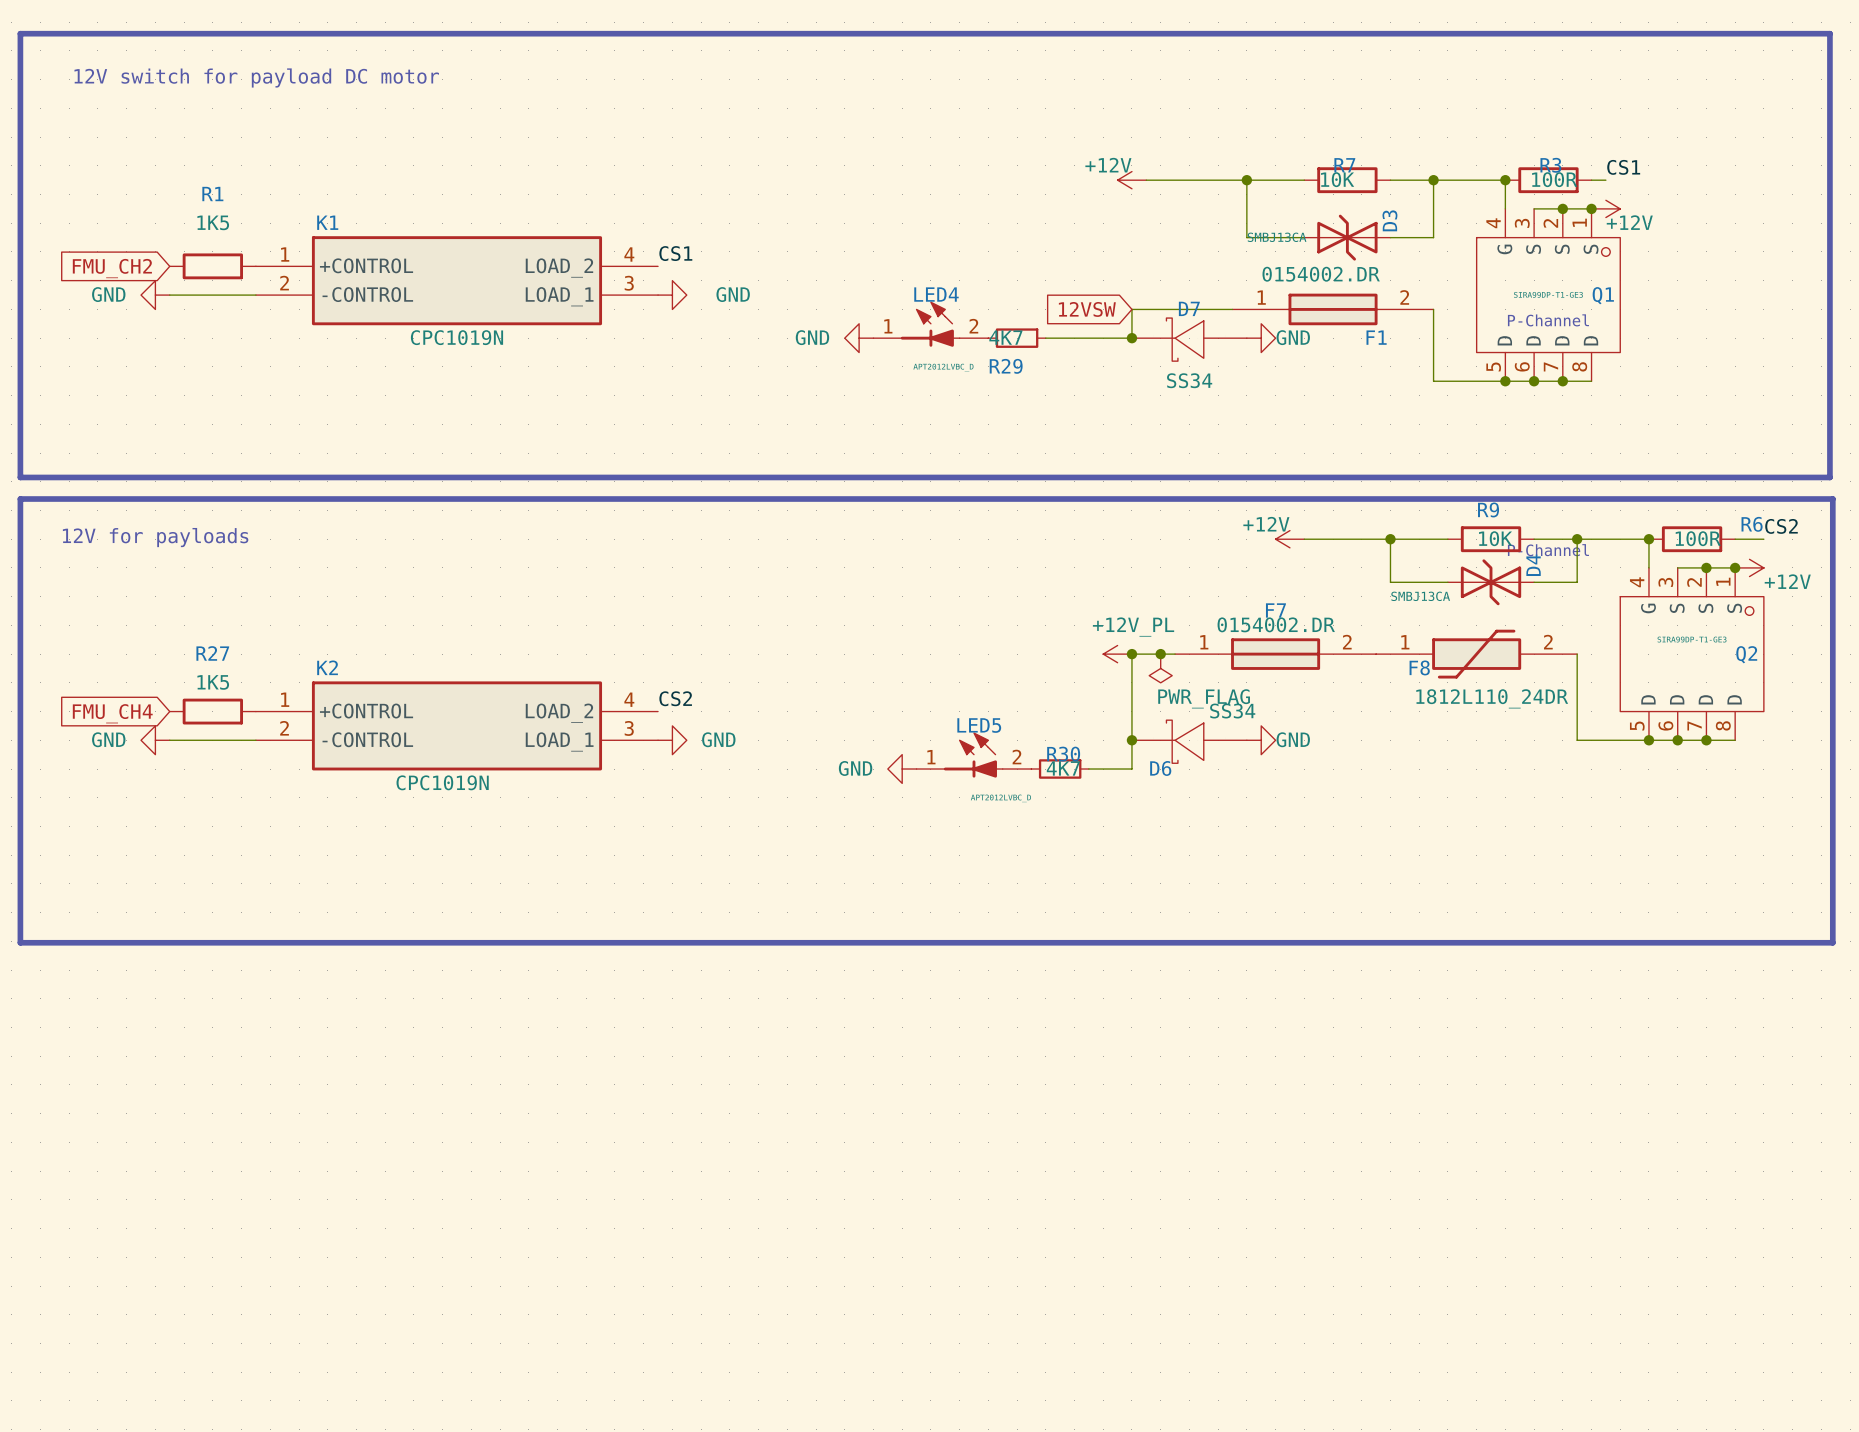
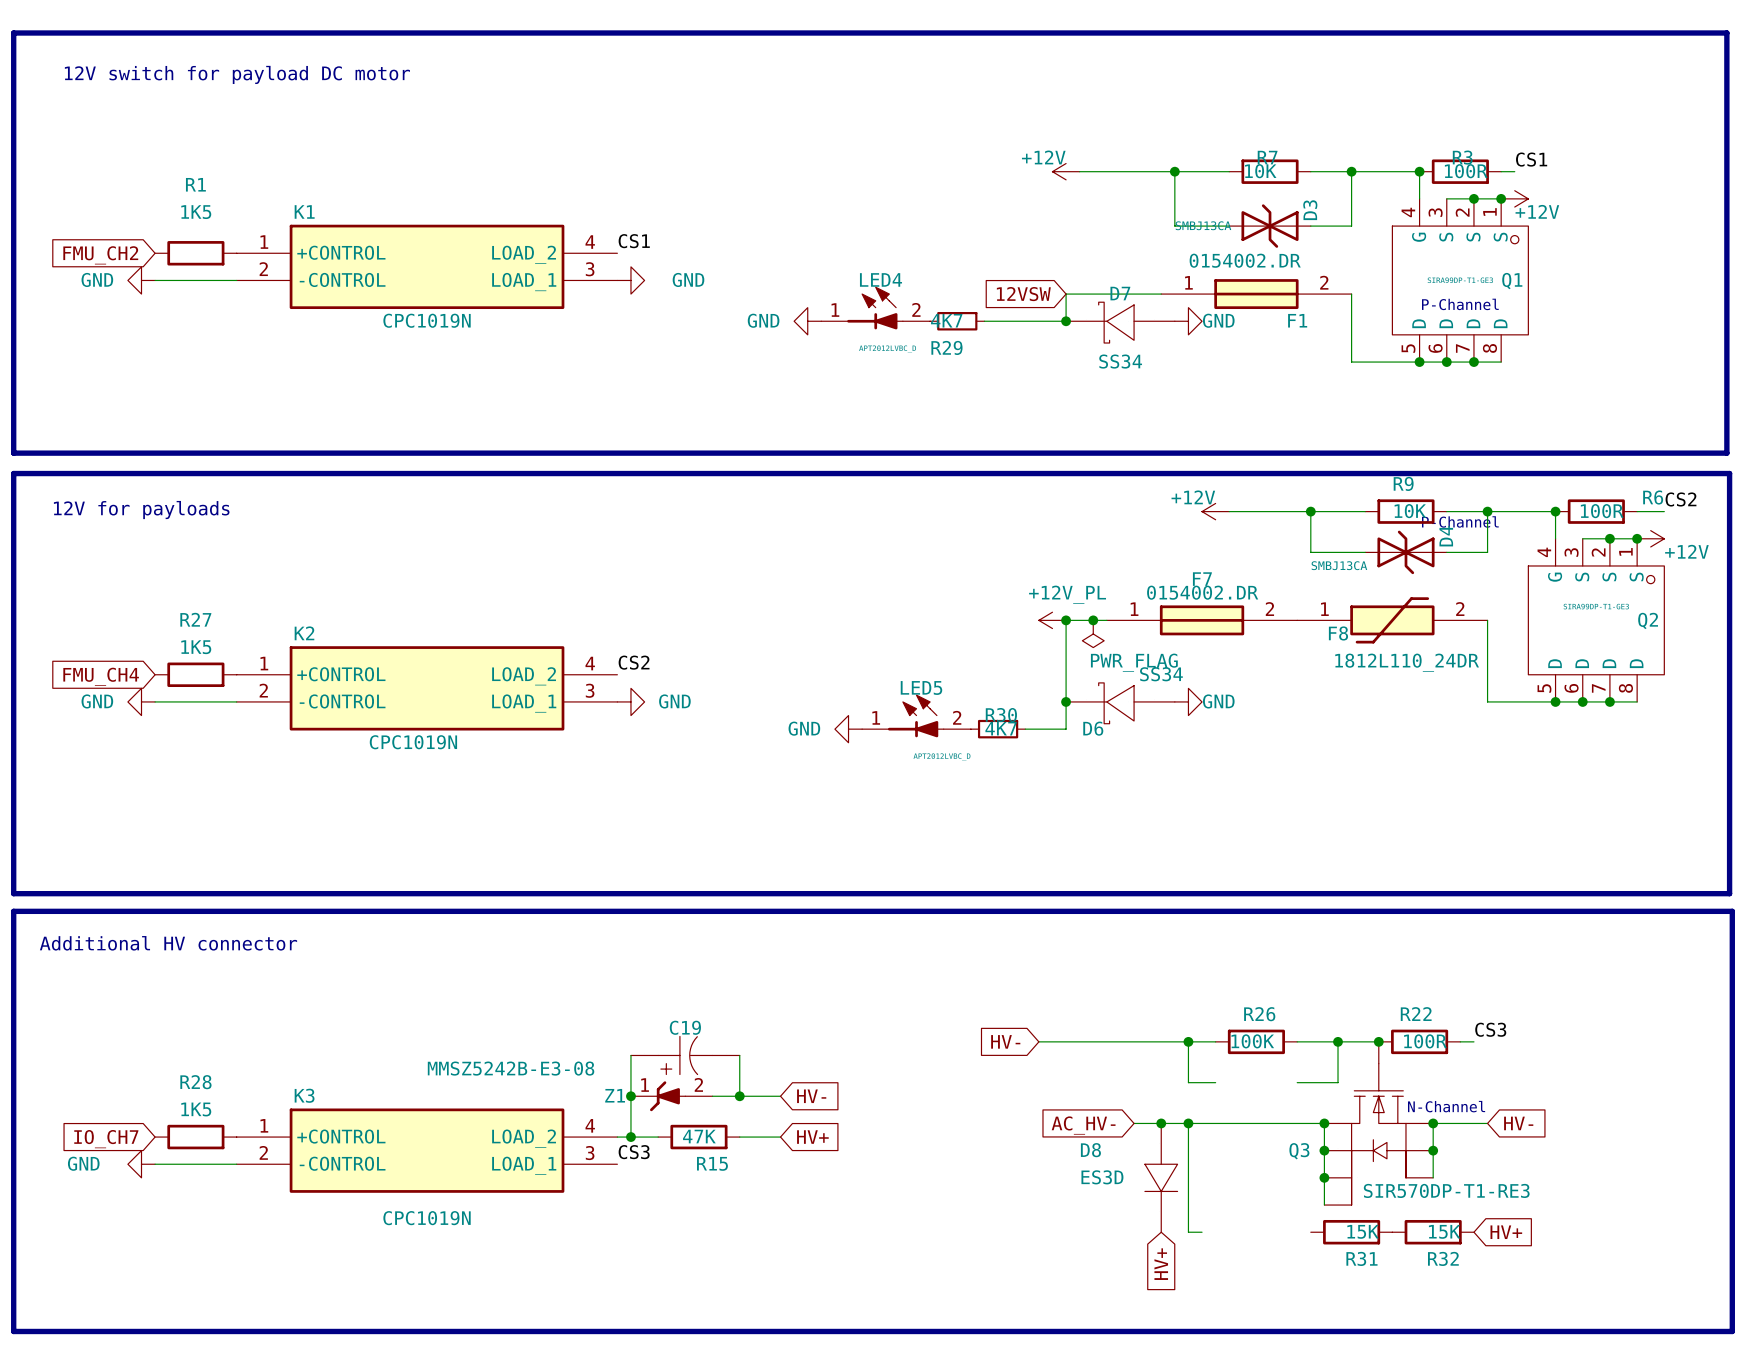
line: none -> (13, 911) (1732, 911) (1732, 1331) (13, 1331) (13, 911)
text: none -> Additional HV connector (168, 943)
label: none -> CS3 (1490, 1029)
global label: none -> HV- (1005, 1041)
wire: none -> (1038, 1041) (1215, 1041)
wire: none -> (1188, 1041) (1188, 1082) (1215, 1082)
junction: none -> (1188, 1041)
R26: none -> 100K (1256, 1041)
wire: none -> (1297, 1041) (1378, 1041)
wire: none -> (1338, 1041) (1338, 1082) (1297, 1082)
junction: none -> (1338, 1041)
junction: none -> (1378, 1041)
R22: none -> 100R (1419, 1041)
wire: none -> (1460, 1041) (1473, 1041)
wire: none -> (630, 1055) (630, 1137)
C19: none -> (685, 1055)
wire: none -> (739, 1055) (739, 1096)
junction: none -> (630, 1096)
Z1: none -> MMSZ5242B-E3-08 (671, 1096)
wire: none -> (712, 1096) (780, 1096)
junction: none -> (739, 1096)
global label: none -> HV- (811, 1096)
text: none -> N-Channel (1446, 1106)
wire: none -> (1134, 1123) (1324, 1123) (1324, 1205)
junction: none -> (1161, 1123)
wire: none -> (1188, 1123) (1188, 1232) (1202, 1232)
junction: none -> (1188, 1123)
junction: none -> (1324, 1123)
Q3: none -> SIR570DP-T1-RE3 (1378, 1123)
junction: none -> (1433, 1123)
wire: none -> (1487, 1123) (1433, 1123) (1433, 1177)
global label: none -> HV- (1518, 1123)
global label: none -> AC_HV- (1083, 1125)
R28: none -> 1K5 (195, 1137)
wire: none -> (617, 1137) (658, 1137)
junction: none -> (630, 1137)
R15: none -> 47K (698, 1137)
wire: none -> (739, 1137) (780, 1137)
global label: none -> HV+ (812, 1137)
global label: none -> IO_CH7 (106, 1139)
K3: none -> CPC1019N (427, 1150)
junction: none -> (1324, 1150)
junction: none -> (1433, 1150)
label: none -> CS3 (634, 1152)
power symbol: none -> GND (141, 1164)
wire: none -> (155, 1164) (236, 1164)
D8: none -> ES3D (1161, 1177)
junction: none -> (1324, 1177)
R31: none -> 15K (1351, 1232)
R32: none -> 15K (1433, 1232)
global label: none -> HV+ (1506, 1232)
global label: none -> HV+ (1161, 1264)

